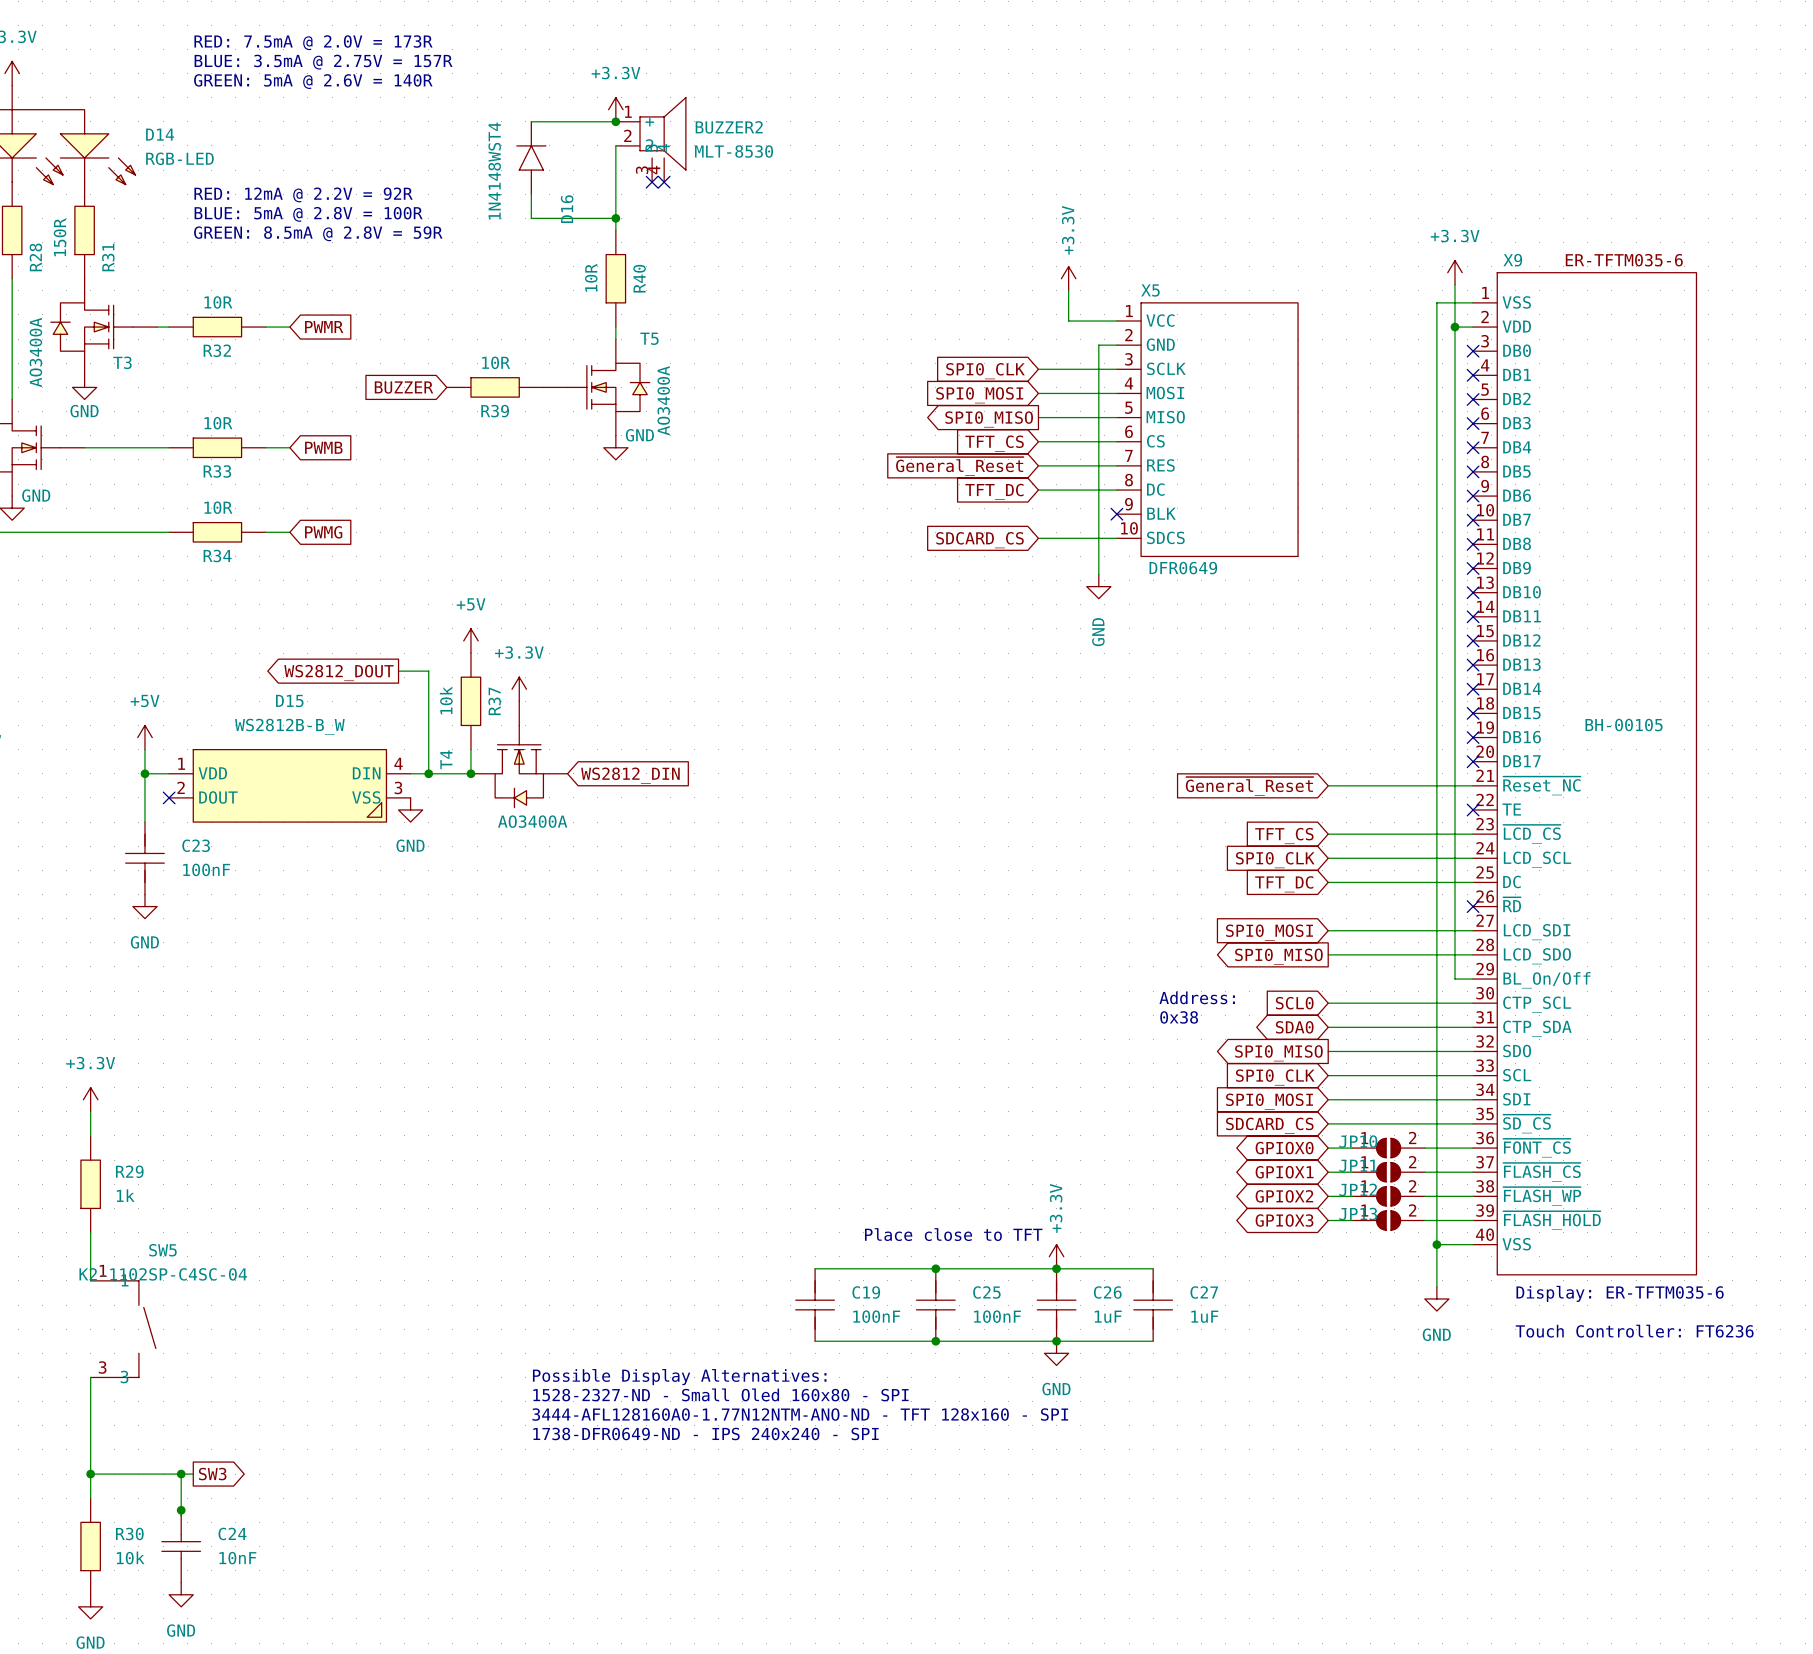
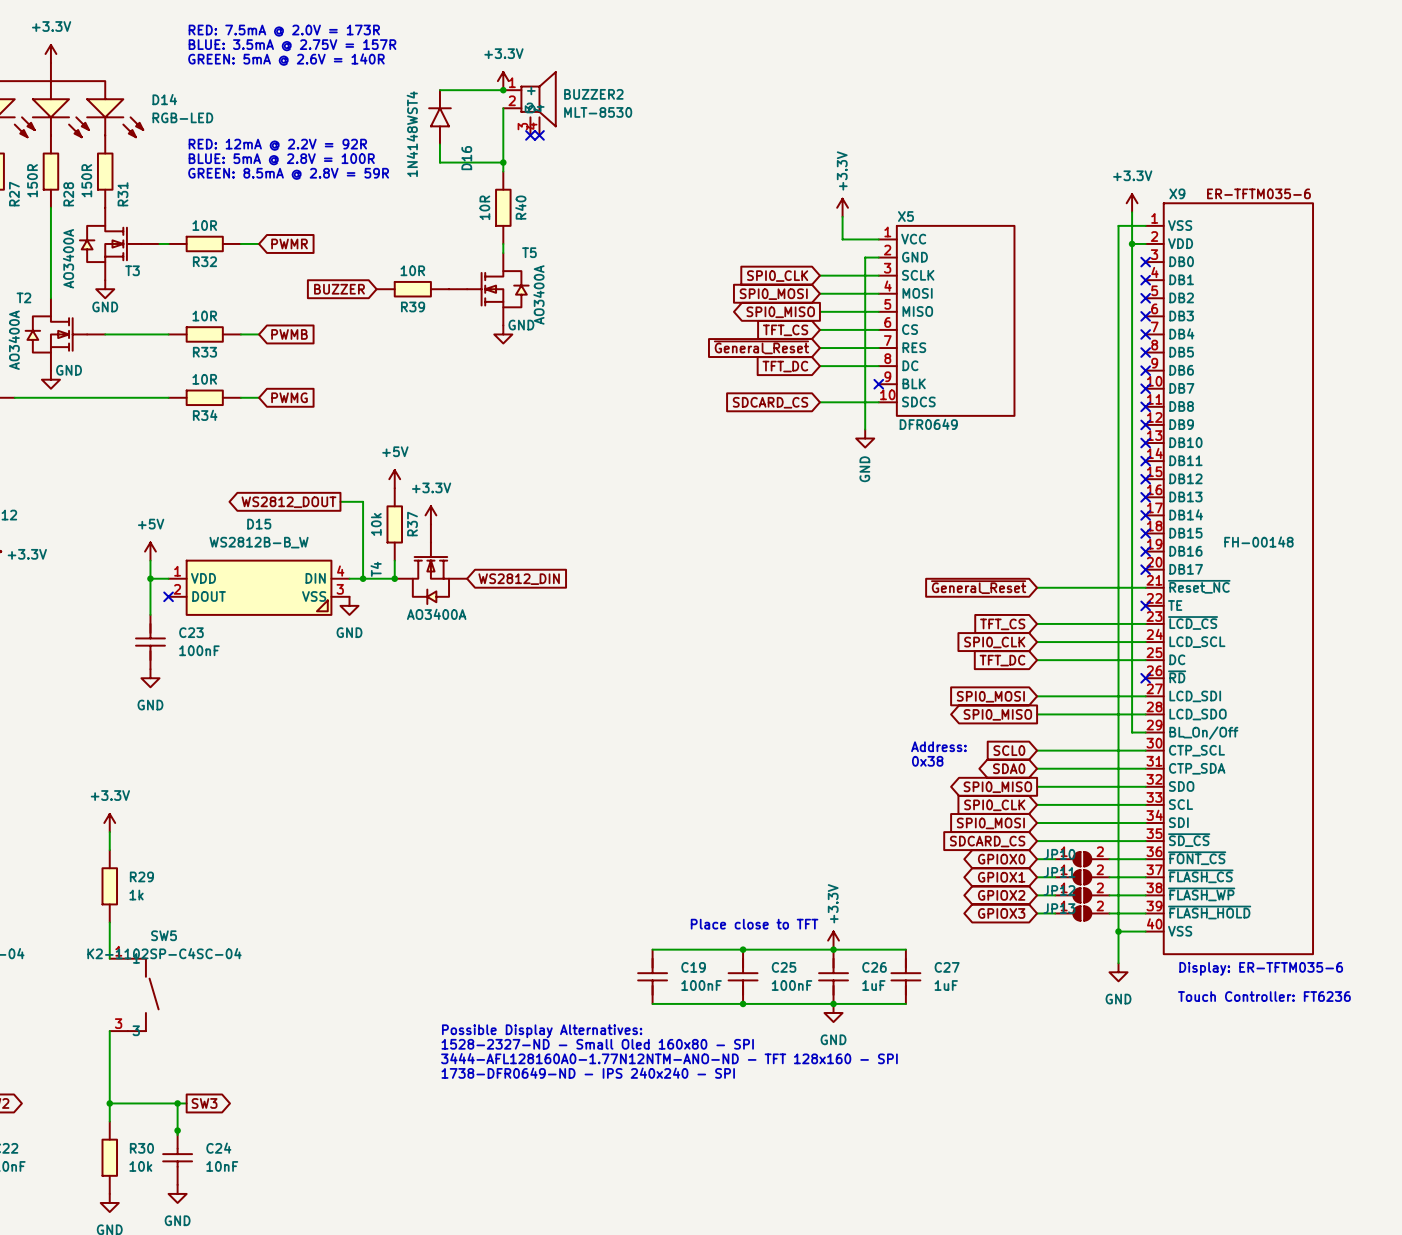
X9 value: BH-00105 (1624, 725) -> FH-00148 (1258, 541)

